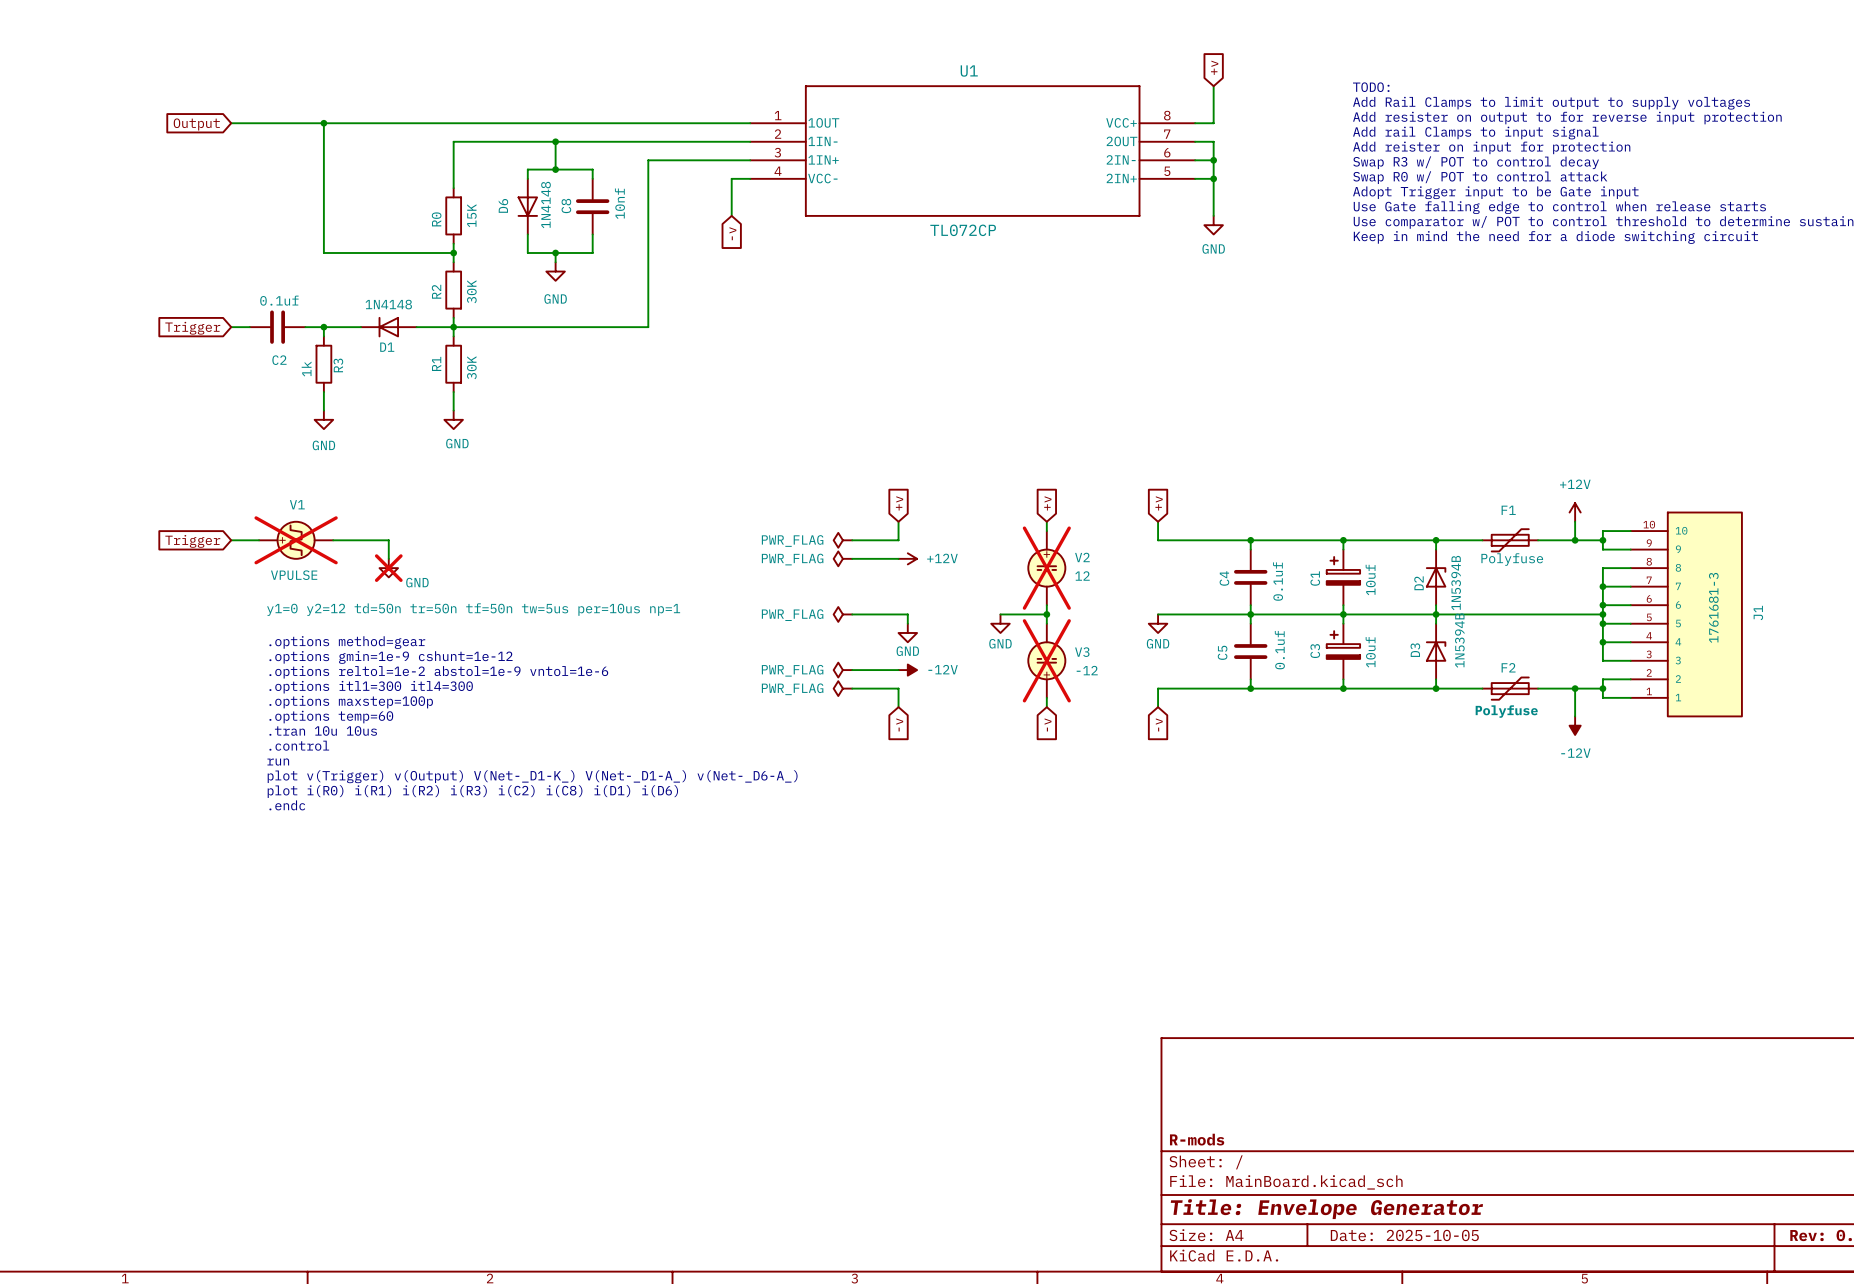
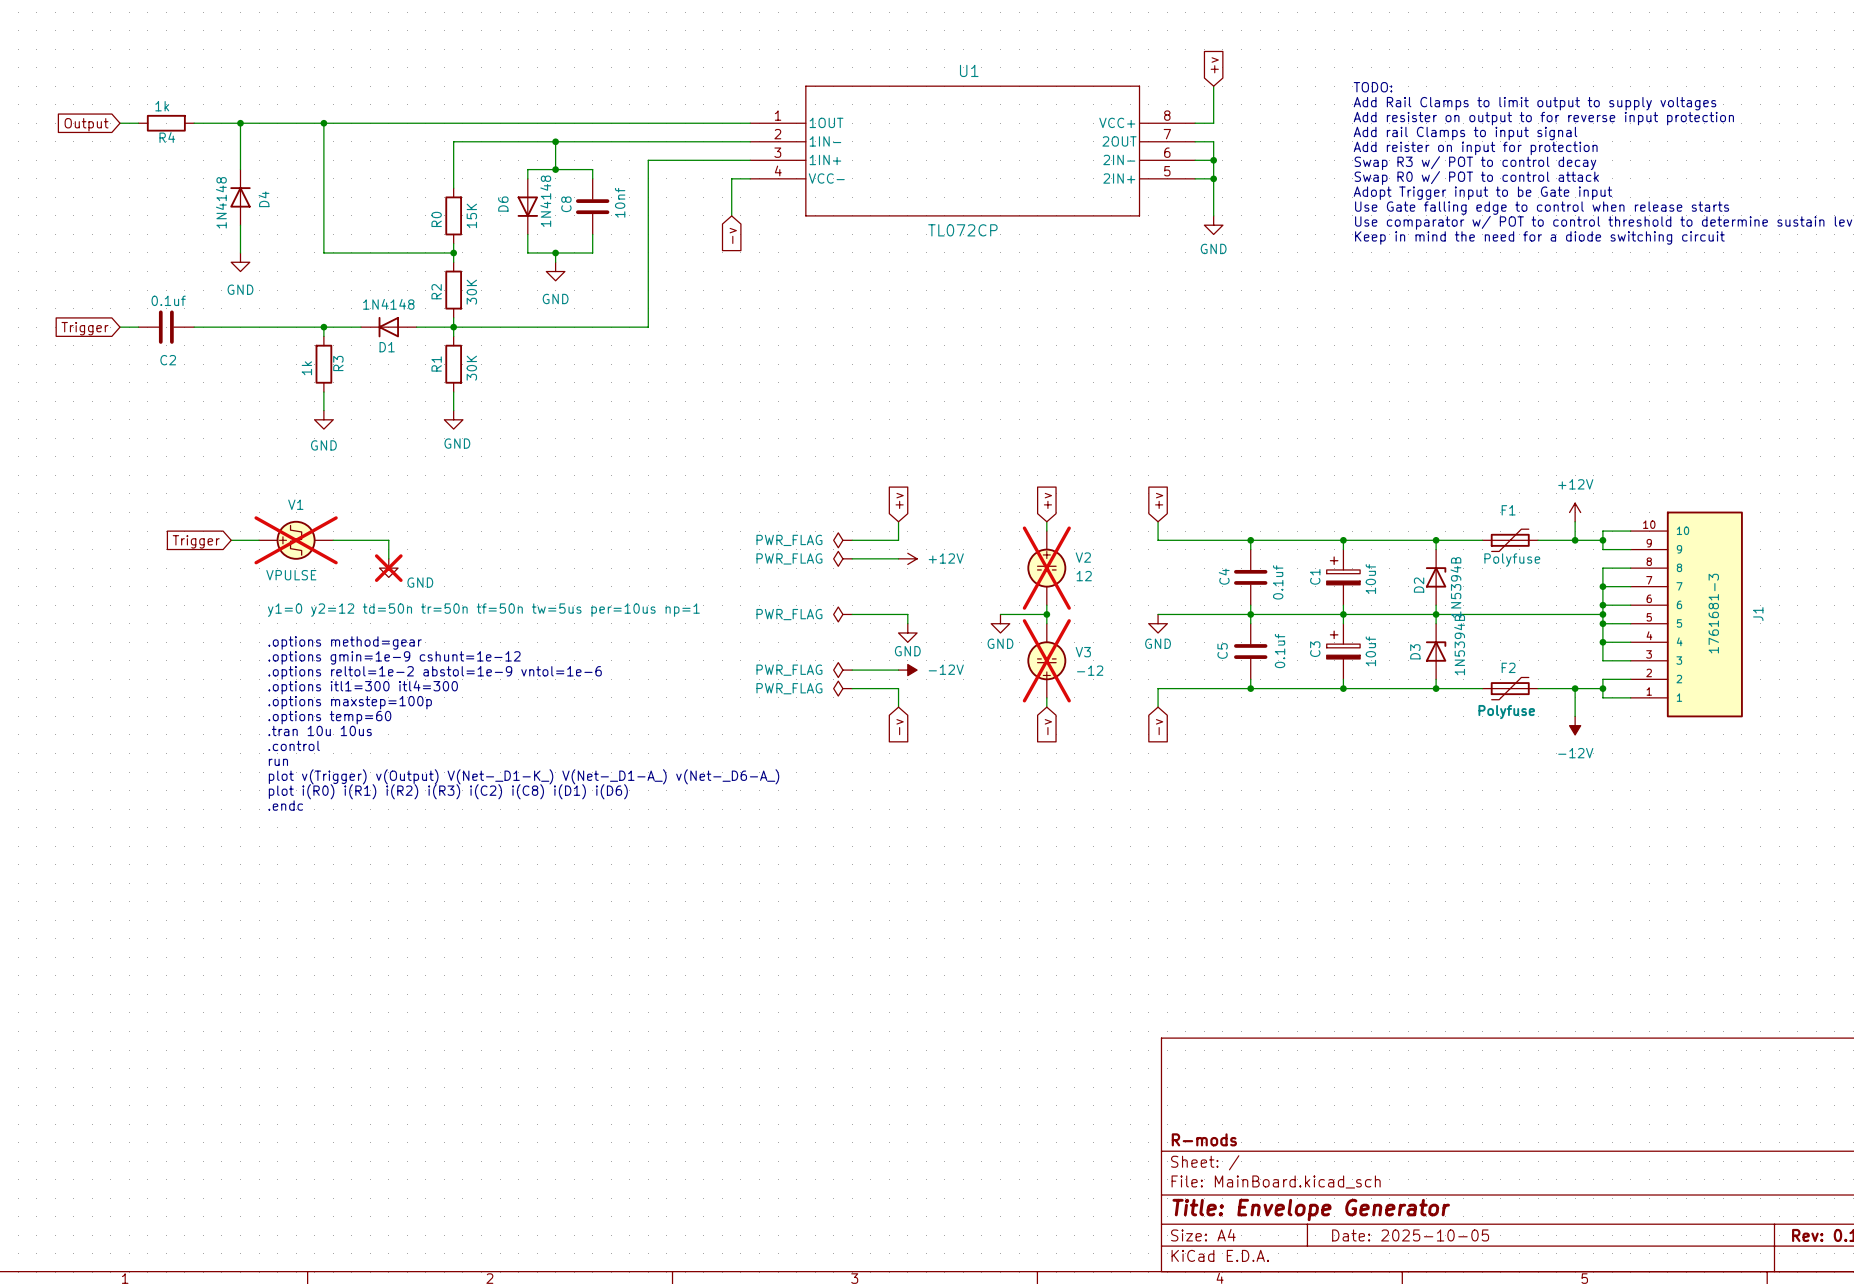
wire: none -> (120, 123) (138, 123)
R4: none -> 1k (166, 123)
wire: none -> (194, 123) (231, 123)
wire: none -> (240, 123) (240, 169)
junction: none -> (240, 123)
global label position: Output (196, 124) -> Output (86, 124)
D4: none -> 1N4148 (240, 197)
wire: none -> (240, 225) (240, 252)
power symbol: none -> GND (240, 262)
wire: none -> (120, 327) (138, 327)
wire: none -> (194, 327) (231, 327)
C2 position: (277, 327) -> (166, 327)
global label position: Trigger (192, 328) -> Trigger (85, 328)

